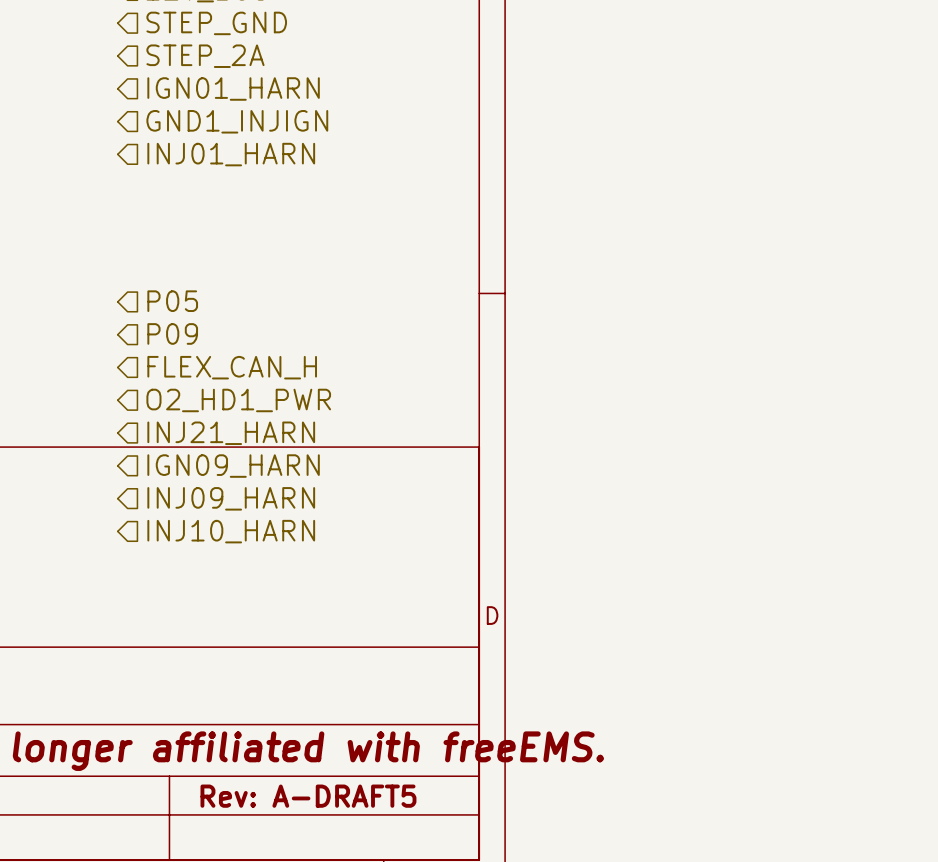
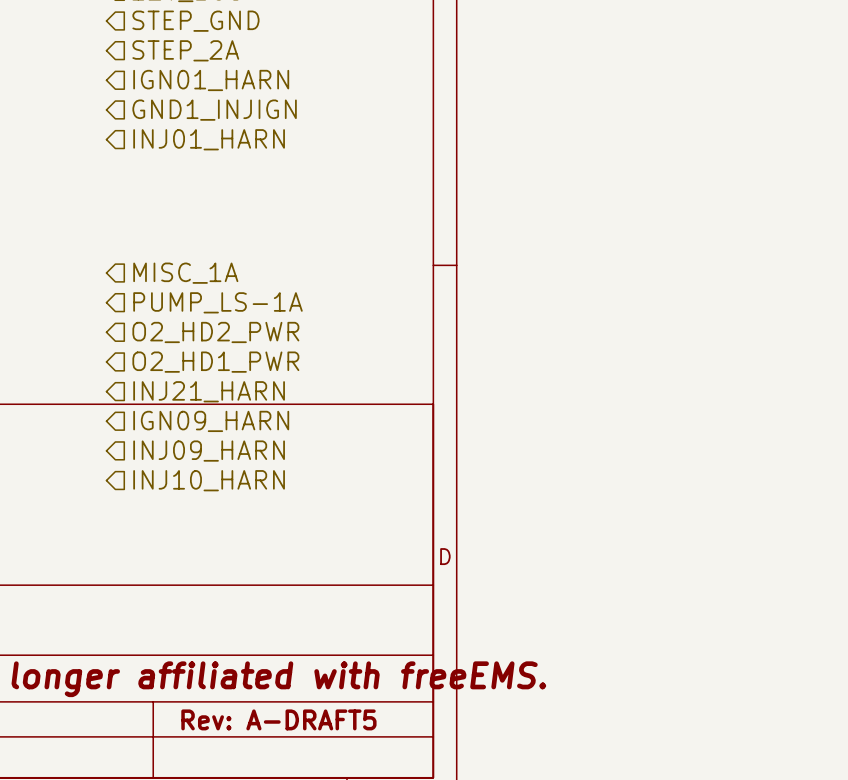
hierarchical label: P05 (172, 301) -> MISC_1A (185, 273)
hierarchical label: P09 (172, 333) -> PUMP_LS-1A (217, 302)
hierarchical label: FLEX_CAN_H (232, 367) -> O2_HD2_PWR (215, 332)

